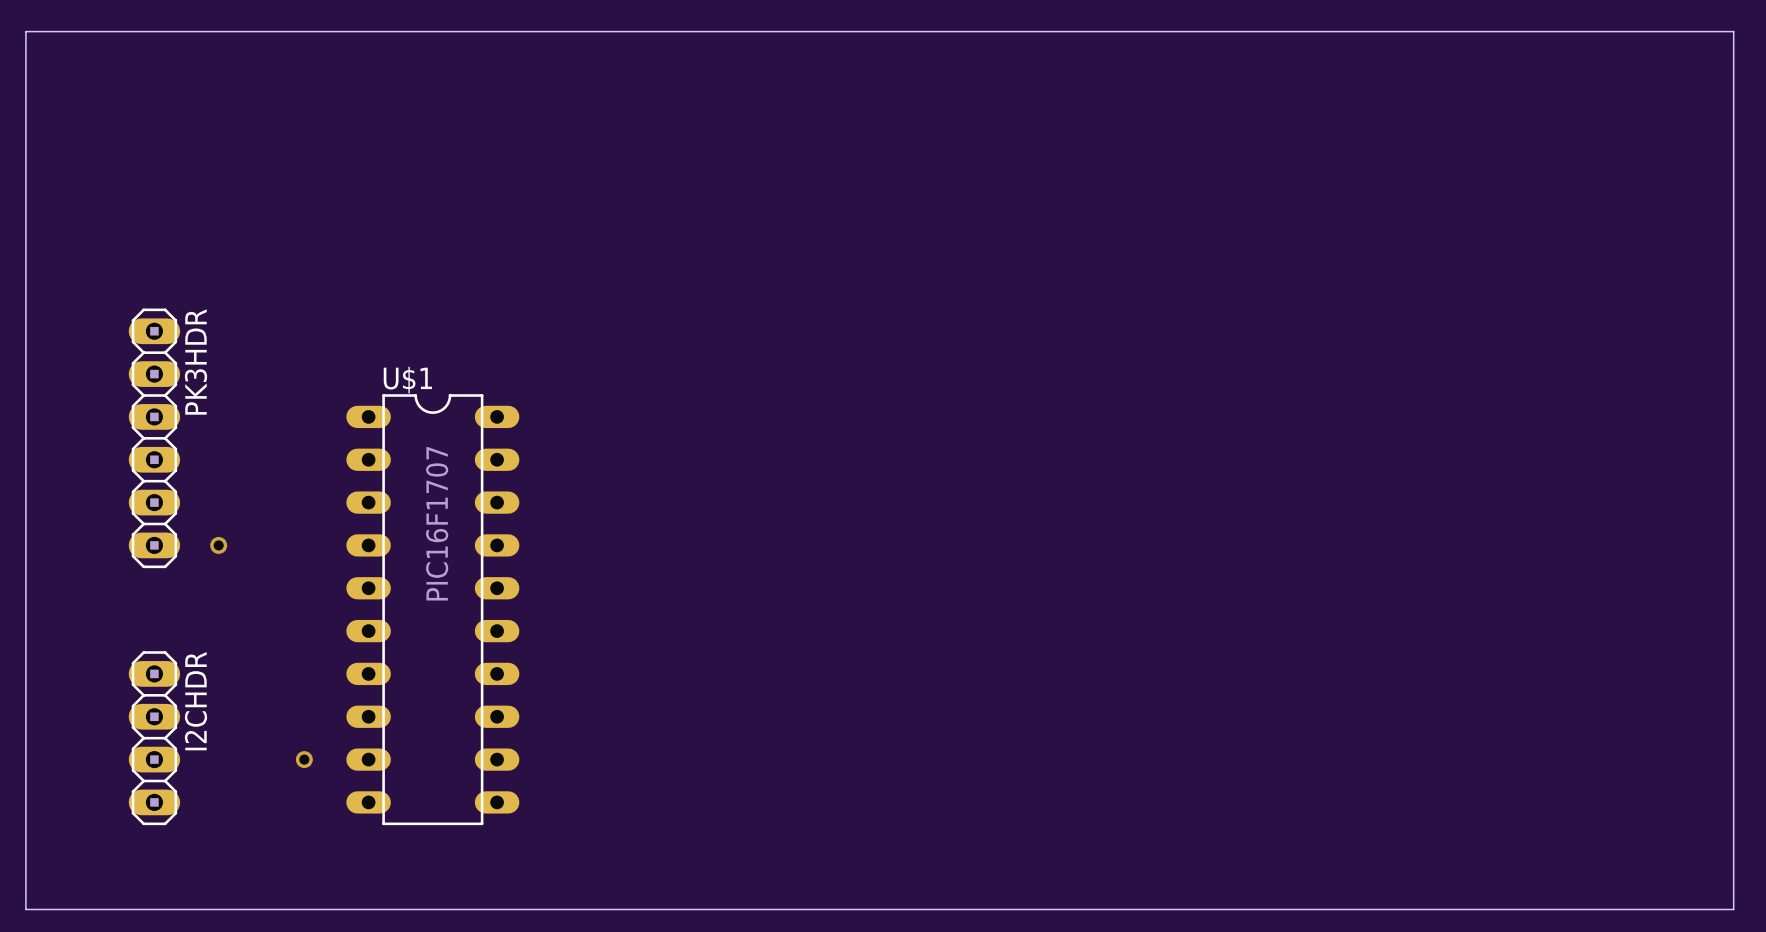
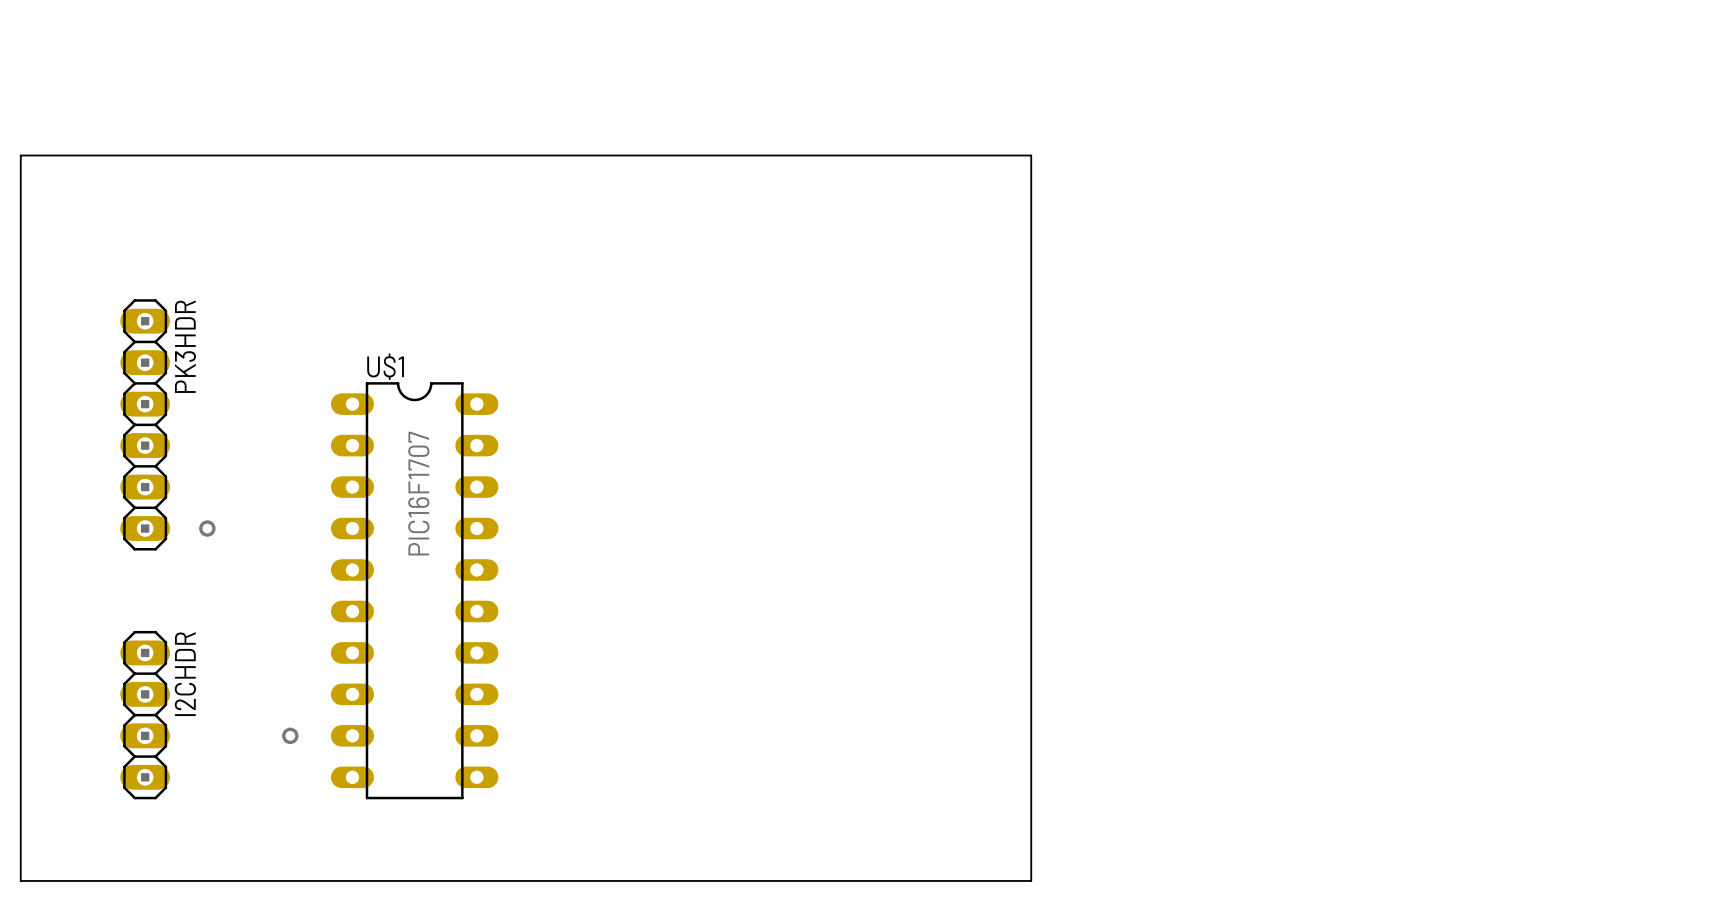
board edge: (25, 160) (25, 31) (1733, 31) (1733, 909) (1069, 909) -> (20, 155) (1031, 155) (1031, 880)

